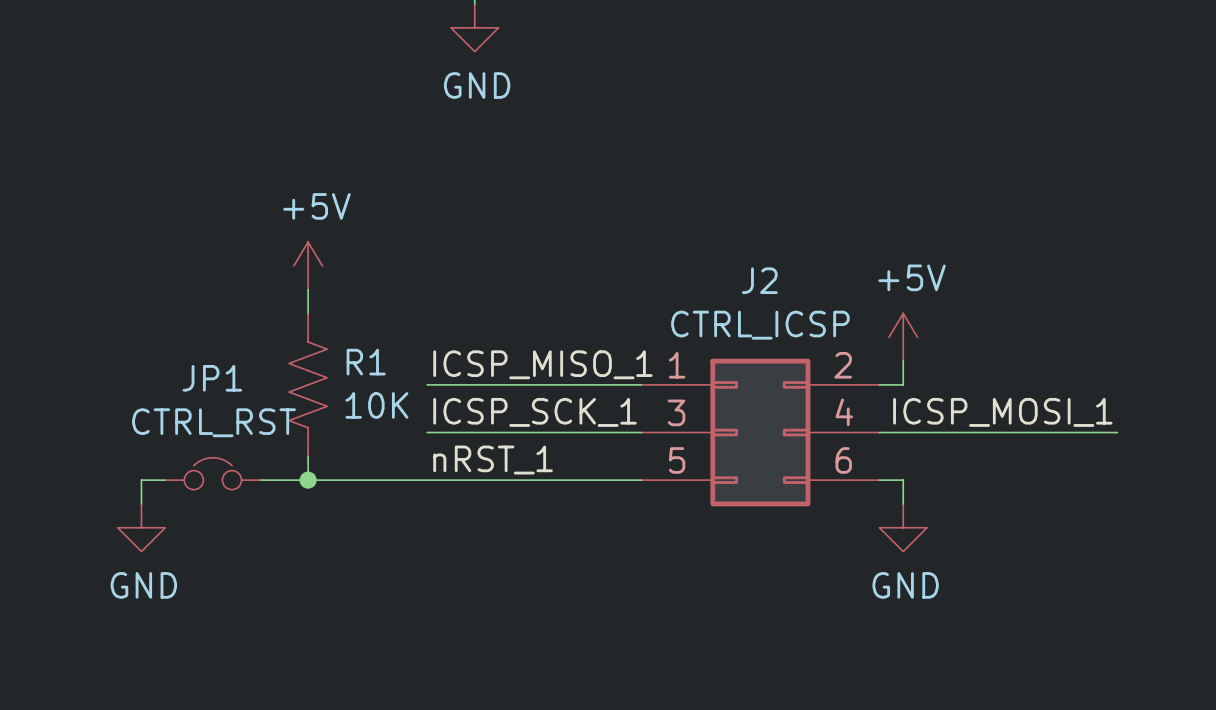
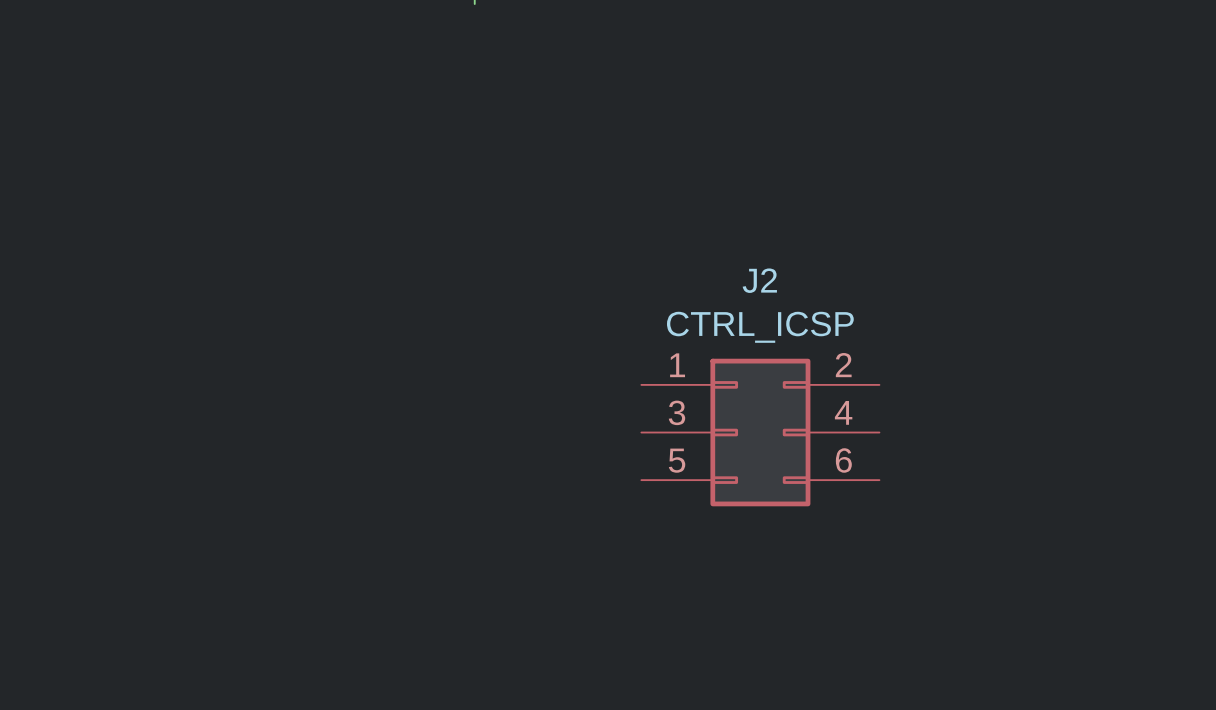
power symbol: GND (474, 27) -> none
power symbol: +5V (308, 265) -> none
wire: (308, 289) (308, 313) -> none
power symbol: +5V (903, 337) -> none
wire: (903, 361) (903, 384) (879, 384) -> none
label: ICSP_MISO_1 (542, 364) -> none
R1: 10K (308, 384) -> none
wire: (427, 384) (641, 384) -> none
label: ICSP_SCK_1 (535, 412) -> none
label: ICSP_MOSI_1 (1002, 412) -> none
wire: (427, 432) (641, 432) -> none
wire: (879, 432) (1117, 432) -> none
wire: (308, 456) (308, 480) -> none
label: nRST_1 (493, 460) -> none
JP1: CTRL_RST (212, 473) -> none
wire: (165, 480) (141, 480) (141, 503) -> none
wire: (260, 480) (641, 480) -> none
junction: (308, 480) -> none
wire: (879, 480) (903, 480) (903, 503) -> none
power symbol: GND (141, 527) -> none
power symbol: GND (903, 527) -> none

